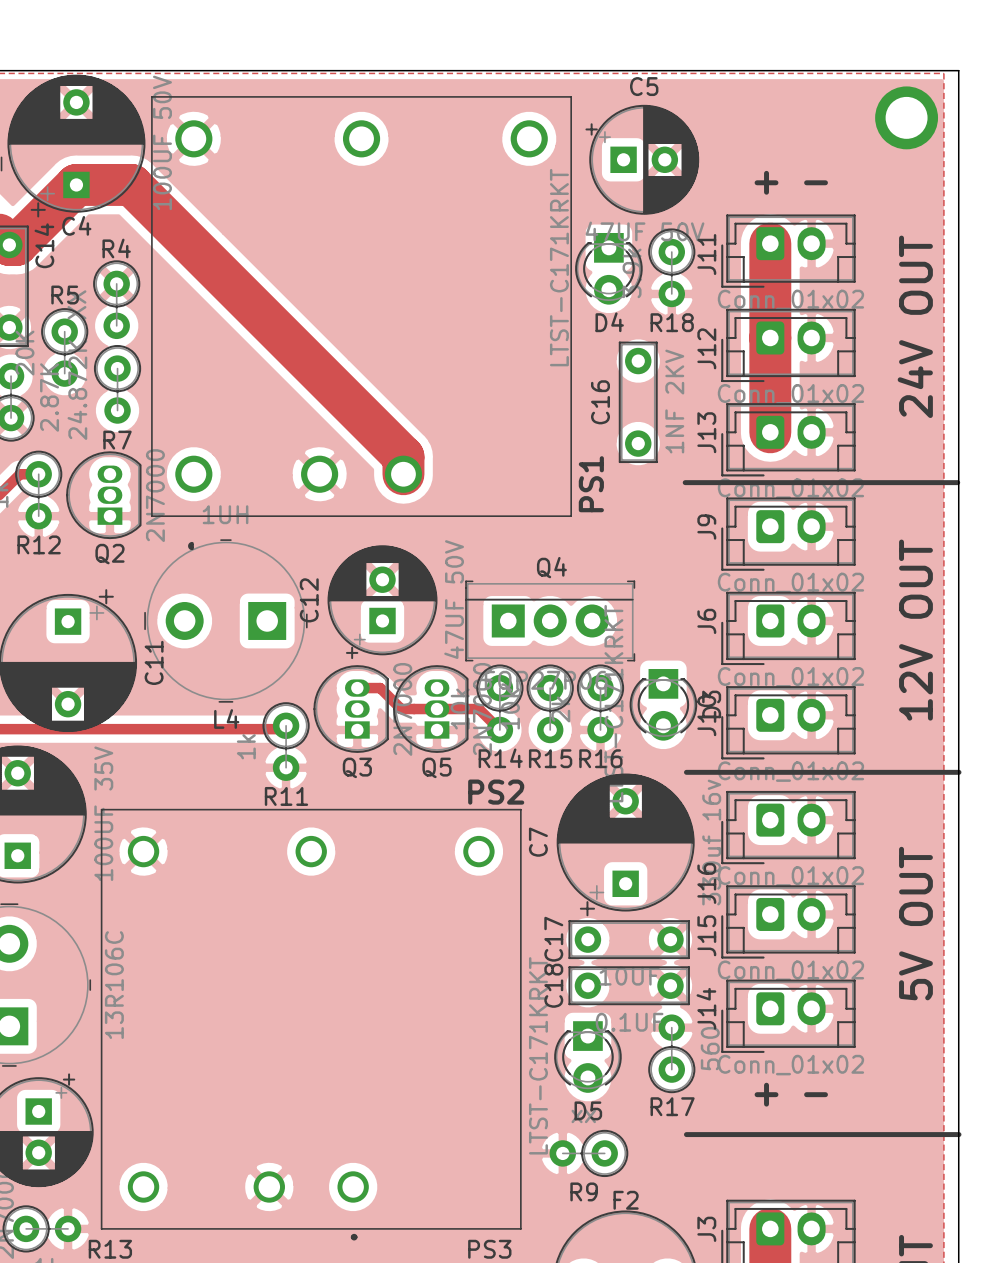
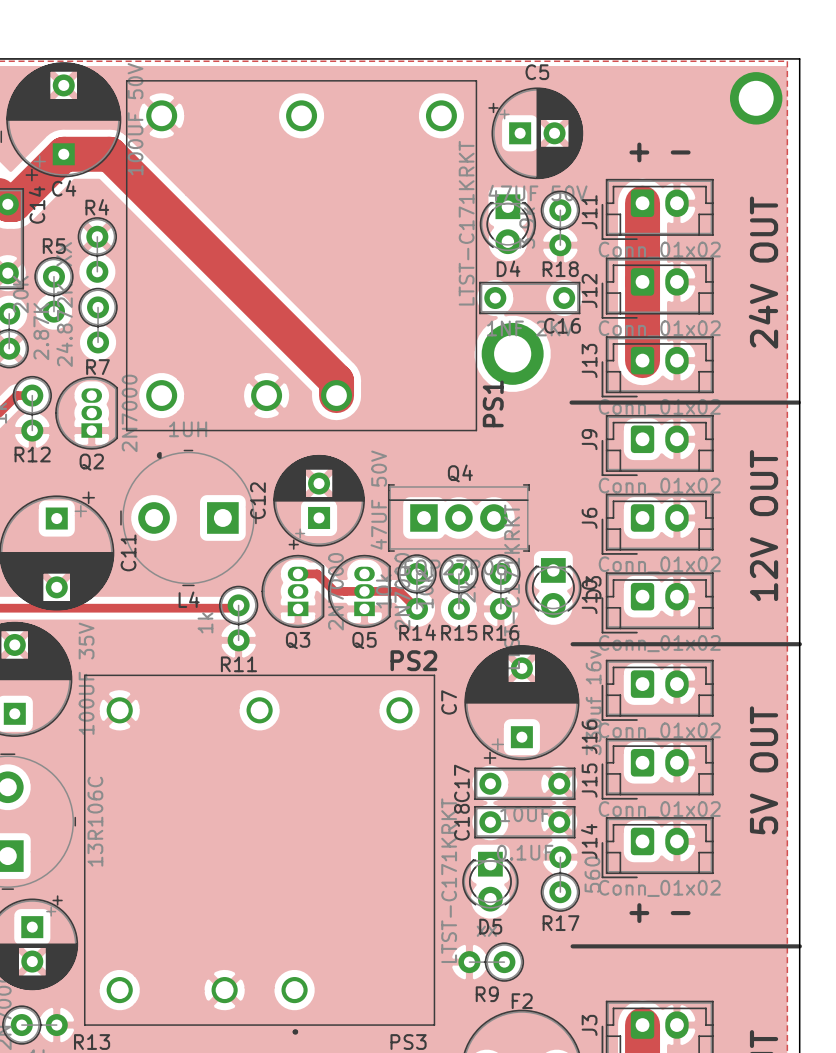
C16 name position: C16 (600, 402) -> C16 (562, 325)
C16 rotation: 0° (638, 402) -> 90° clockwise (529, 298)
via: none -> (512, 353)

